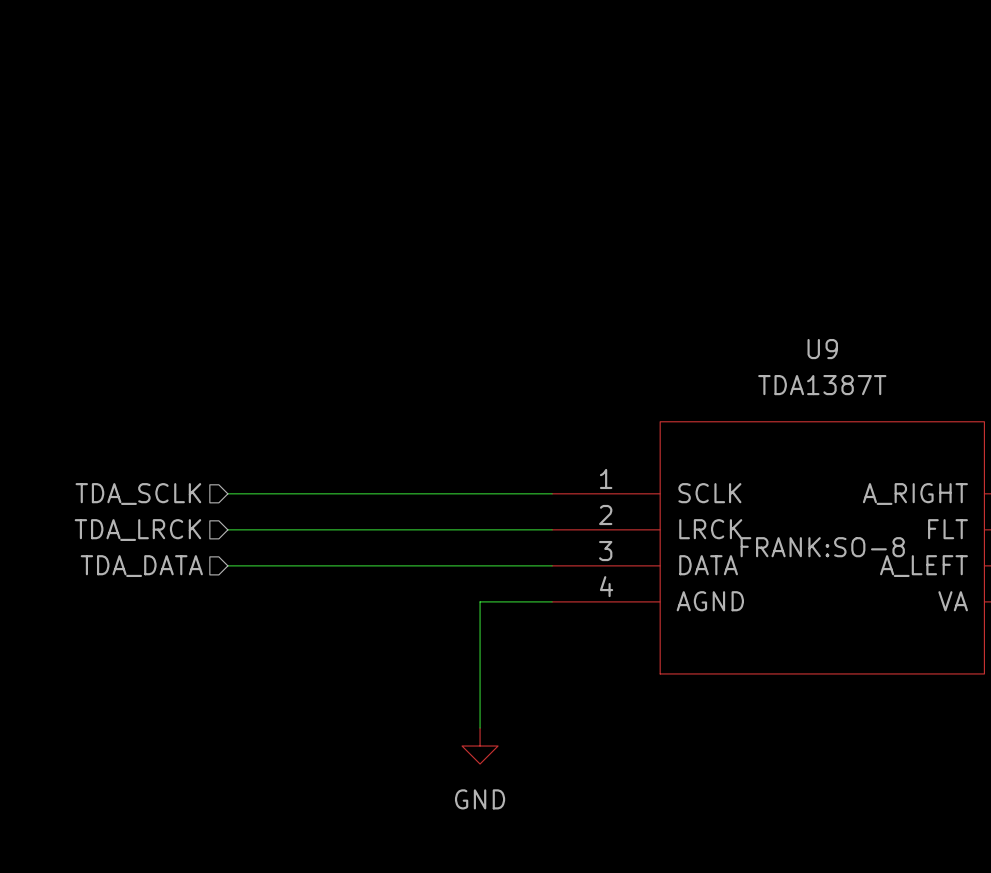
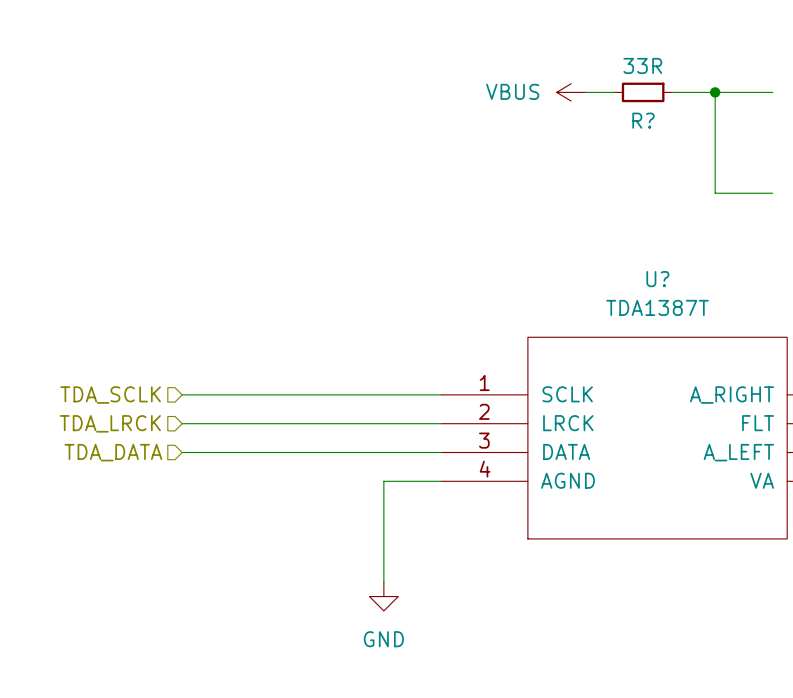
power symbol: none -> VBUS (571, 92)
wire: none -> (585, 92) (614, 92)
R?: none -> 33R (643, 92)
wire: none -> (671, 92) (772, 92)
wire: none -> (715, 92) (715, 193) (772, 193)
junction: none -> (715, 92)
U9 name: U9 (822, 349) -> U? (657, 279)
U9 text: FRANK:SO-8 (822, 547) -> none

